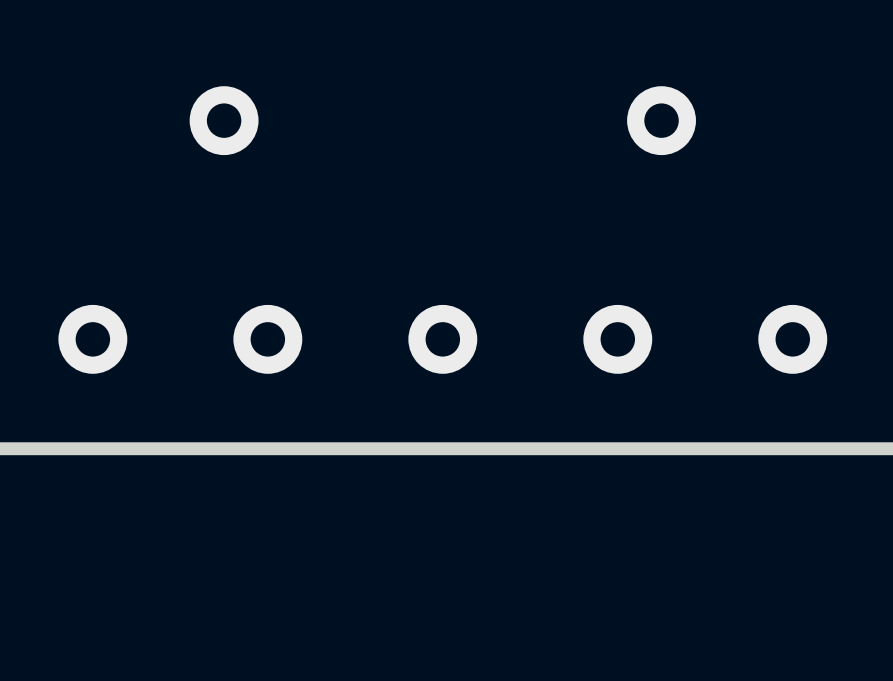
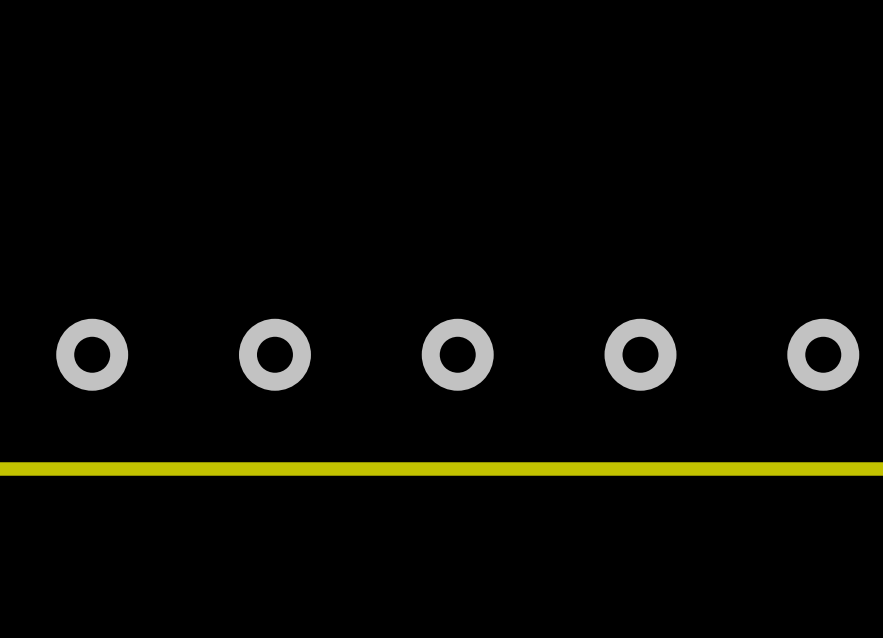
via: (224, 120) -> none
via: (661, 120) -> none

